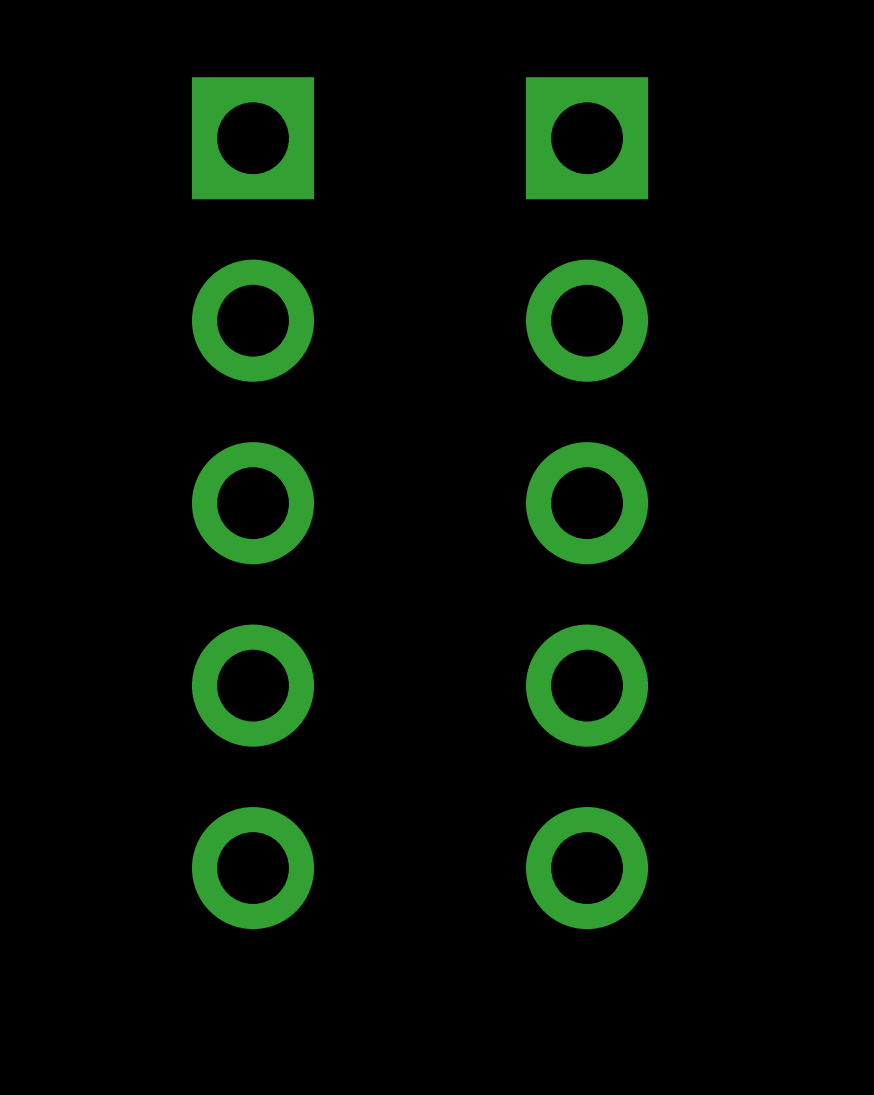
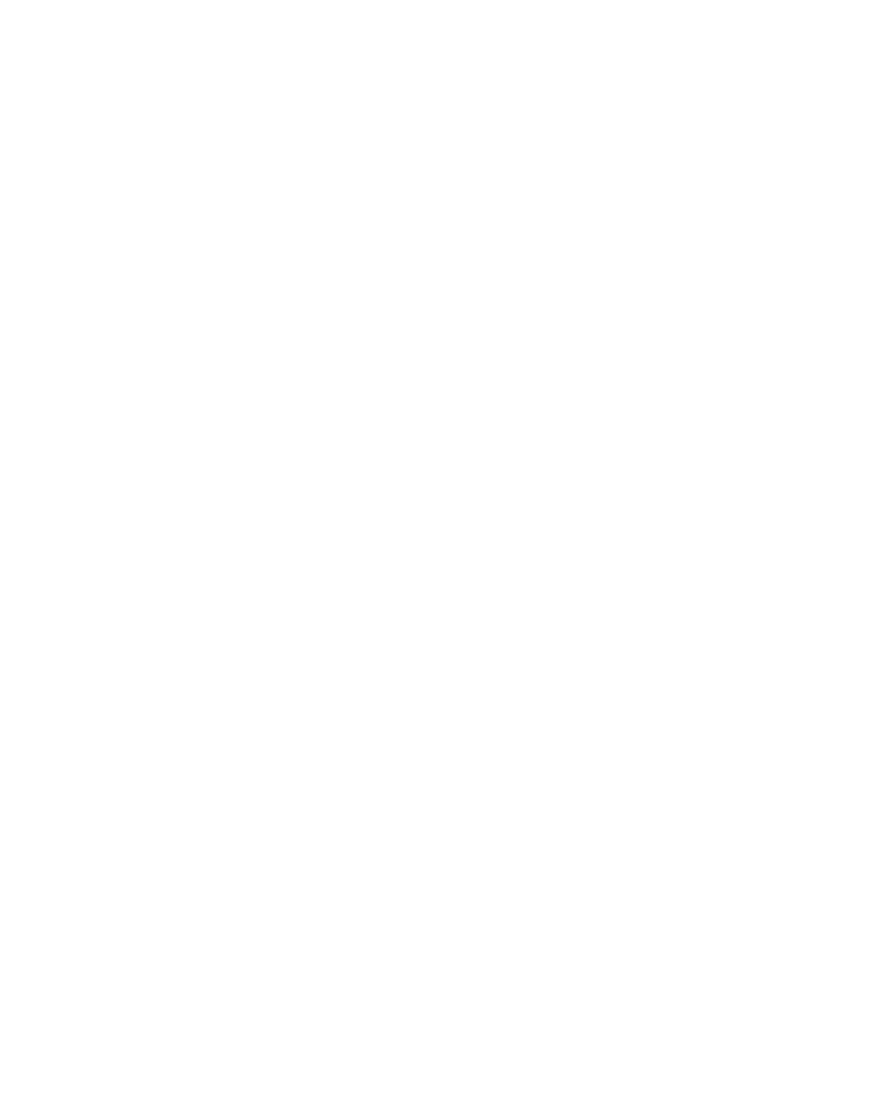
part: (253, 503) -> none
part: (587, 503) -> none

